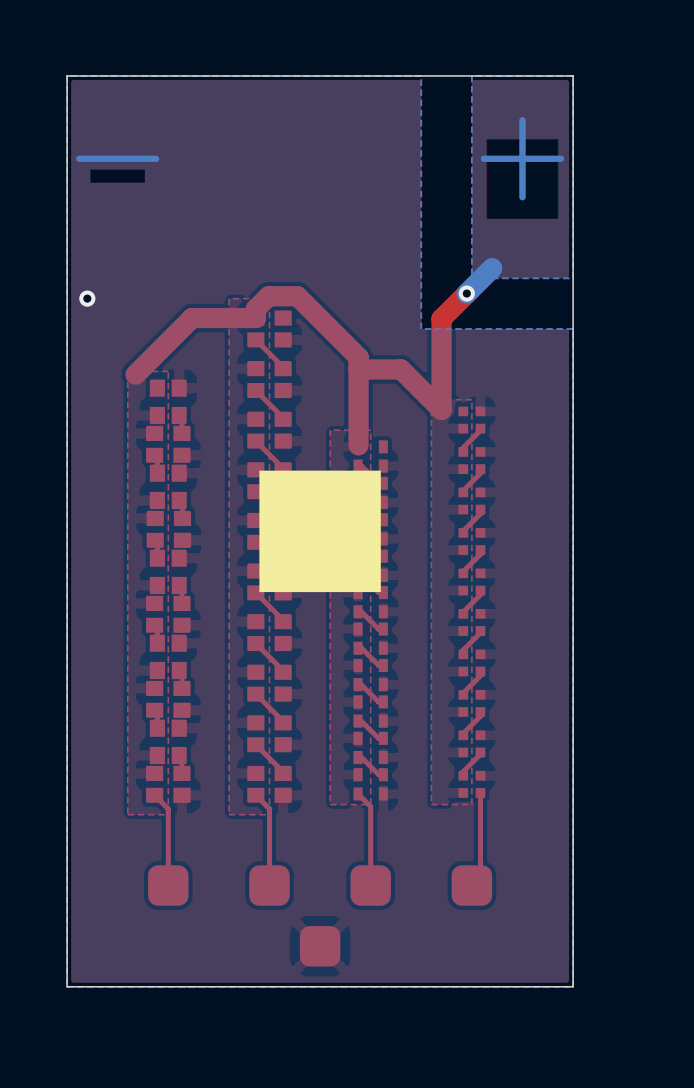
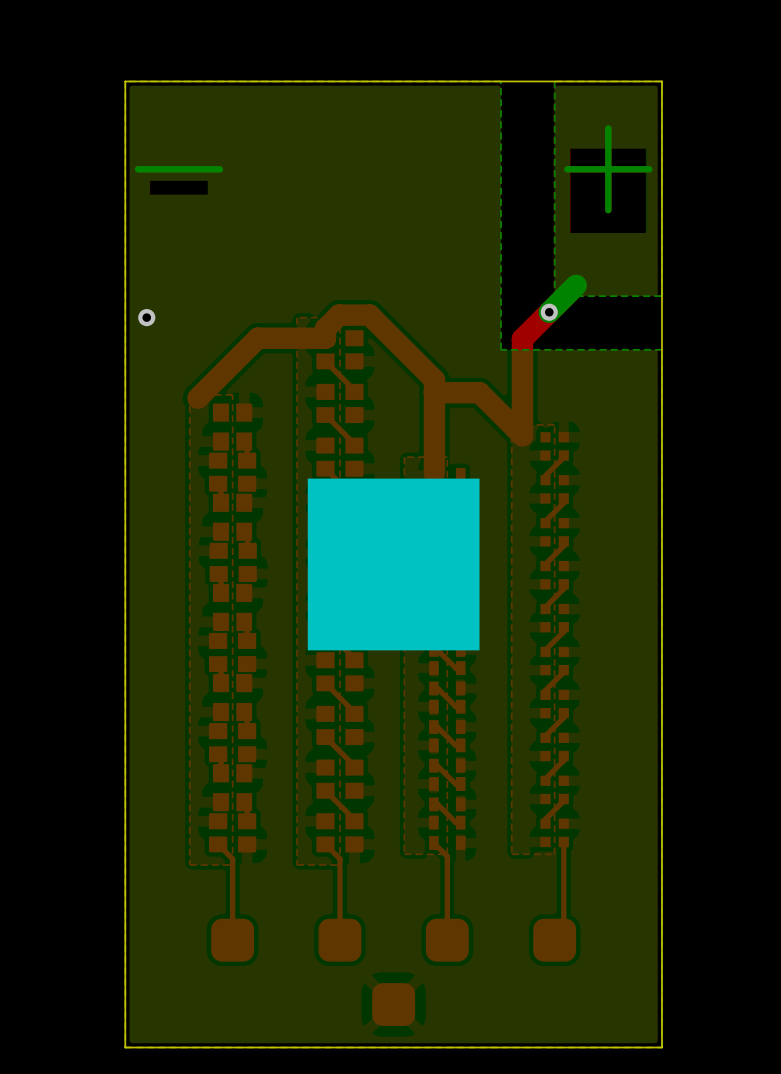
drawing shape: [259, 470, 381, 593] -> [307, 478, 480, 651]

